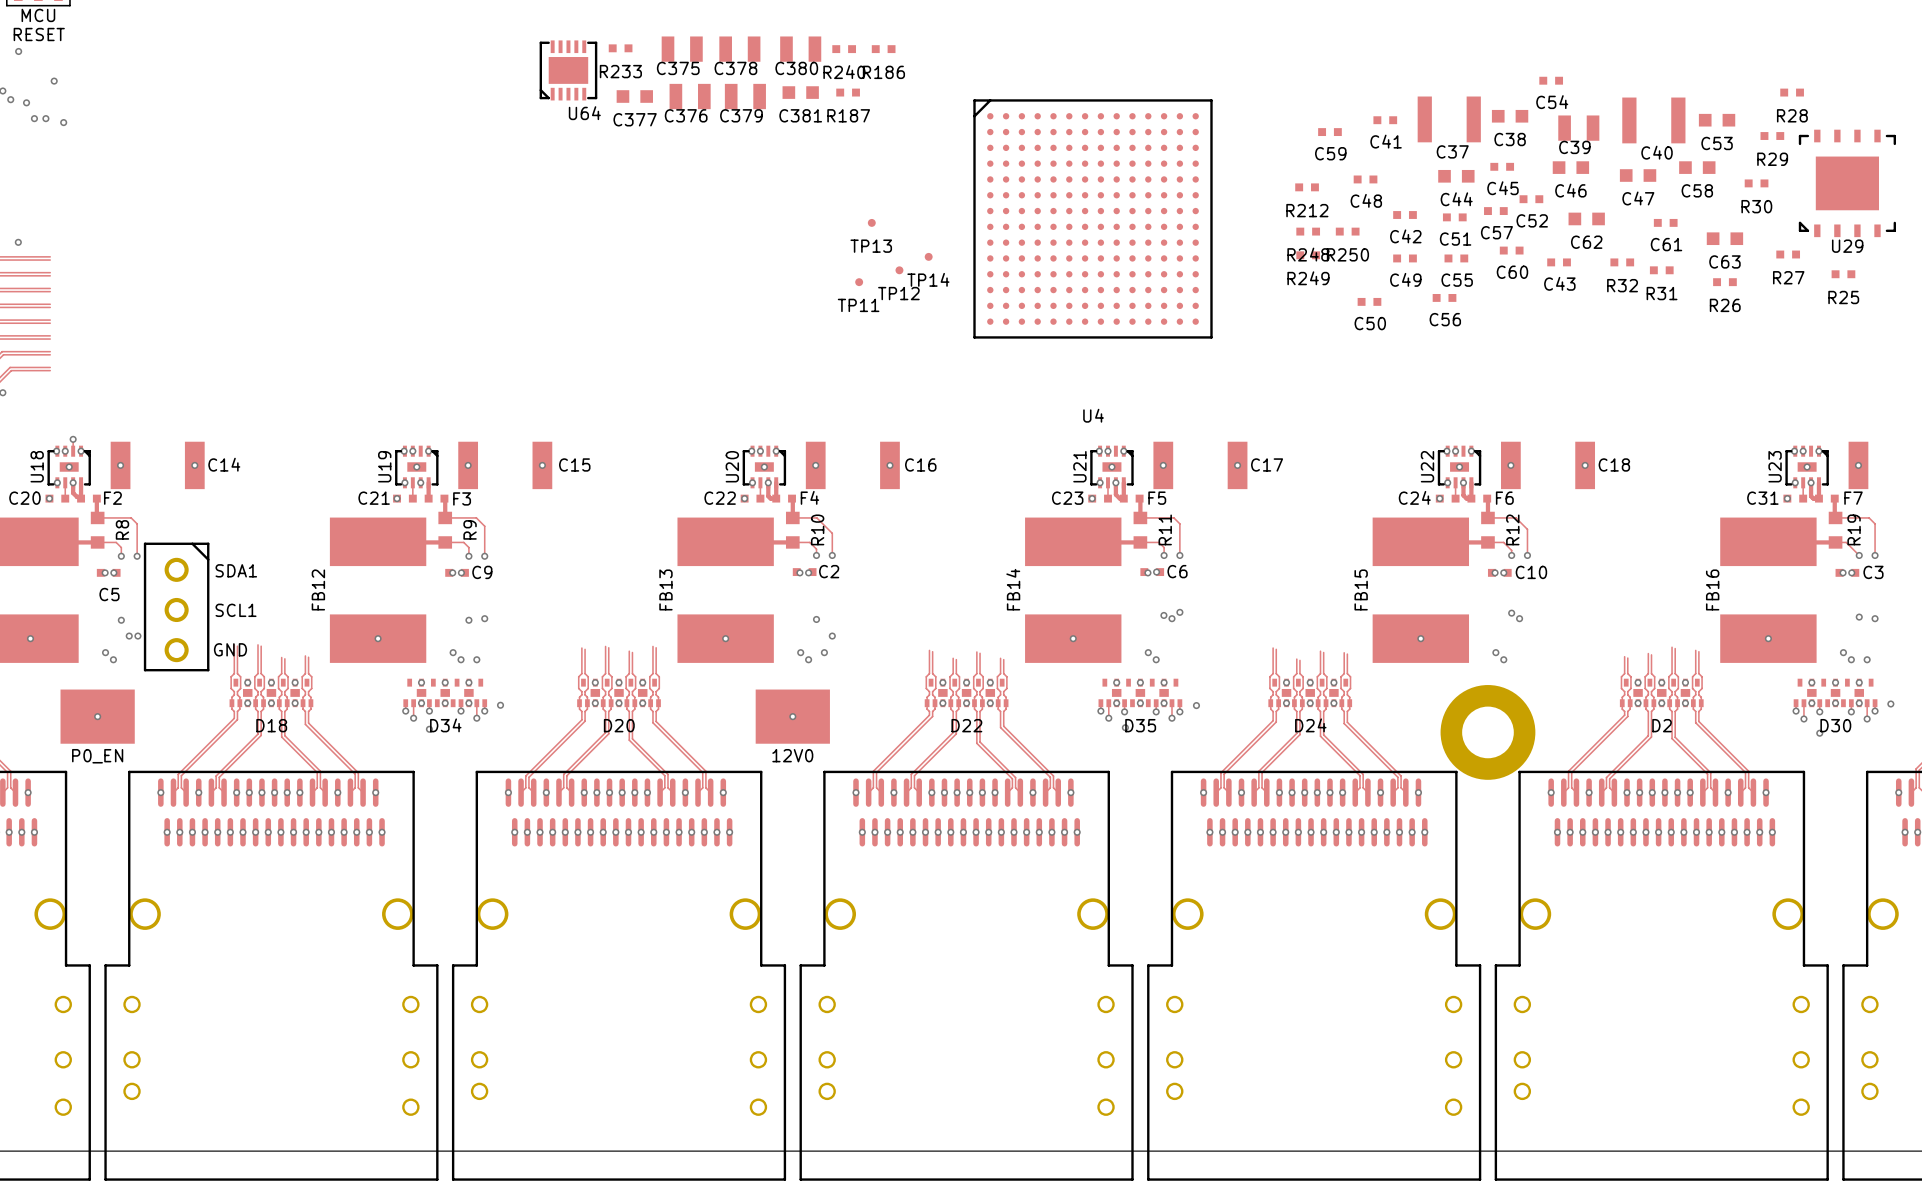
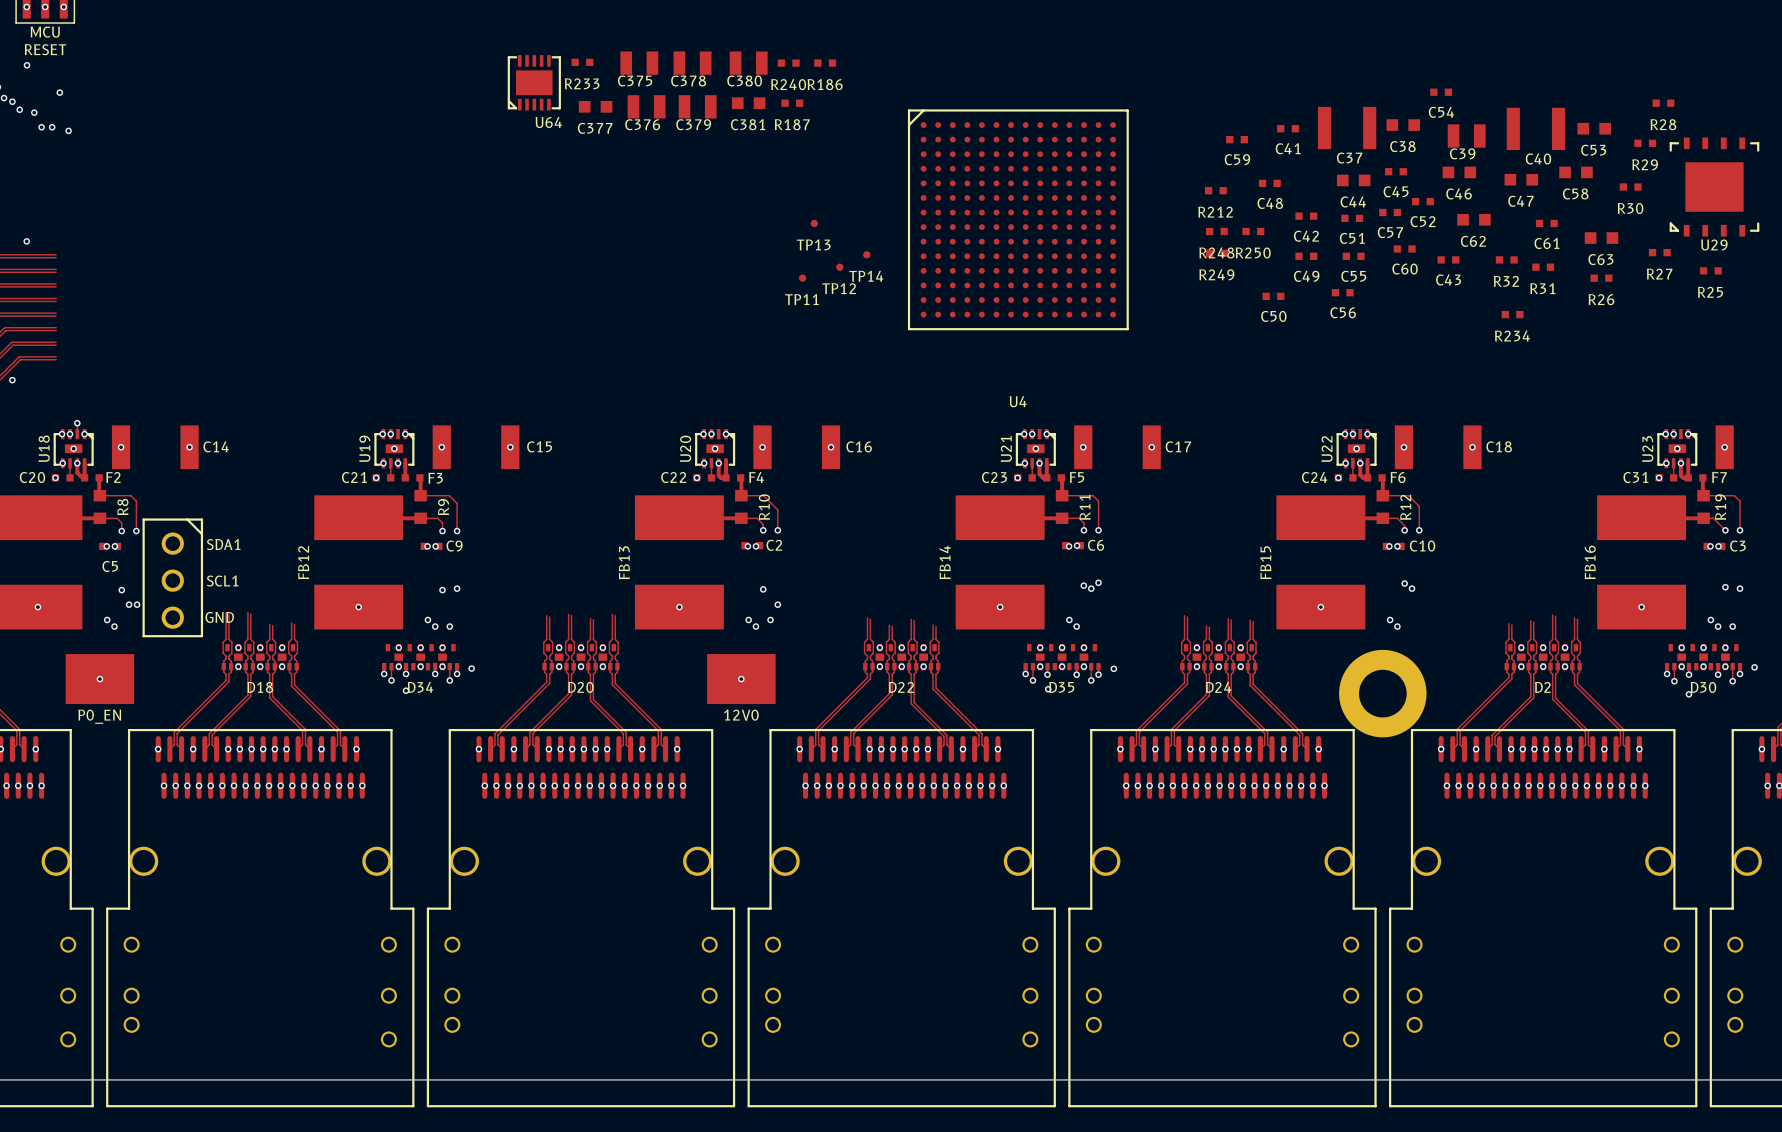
R234: none -> (1512, 314)

